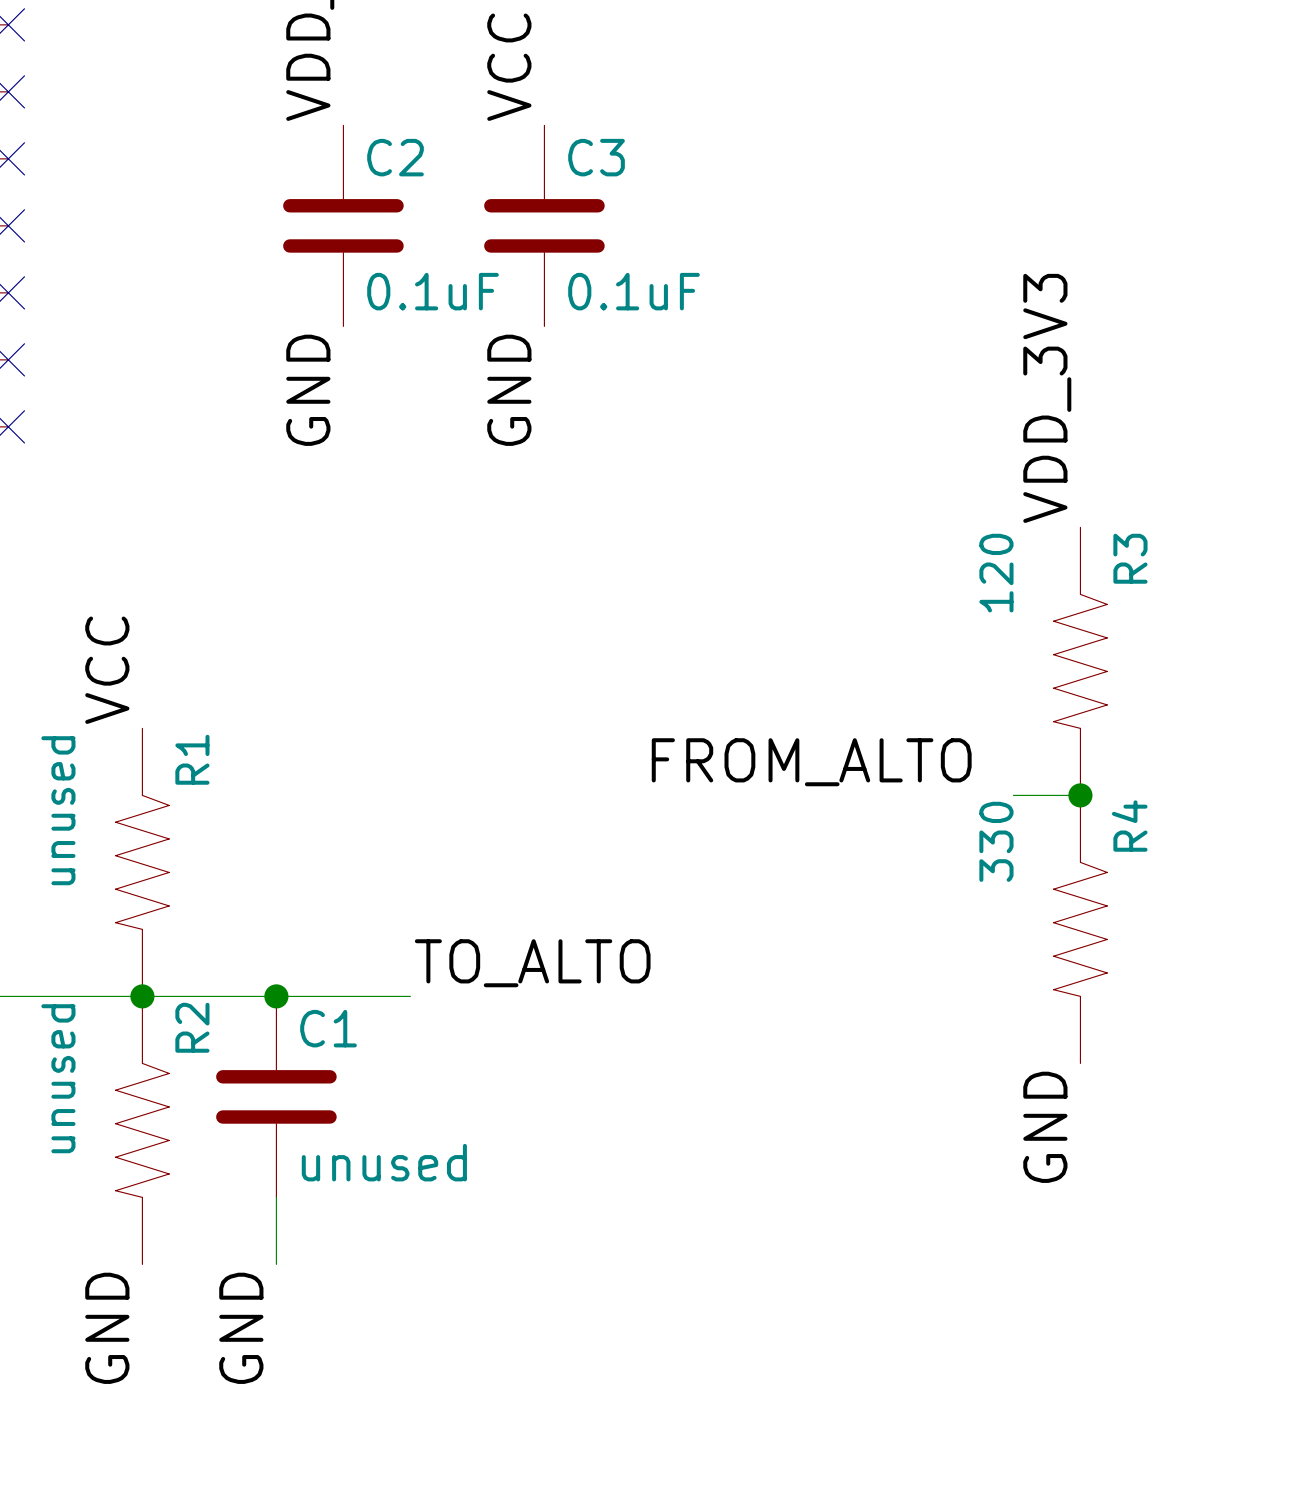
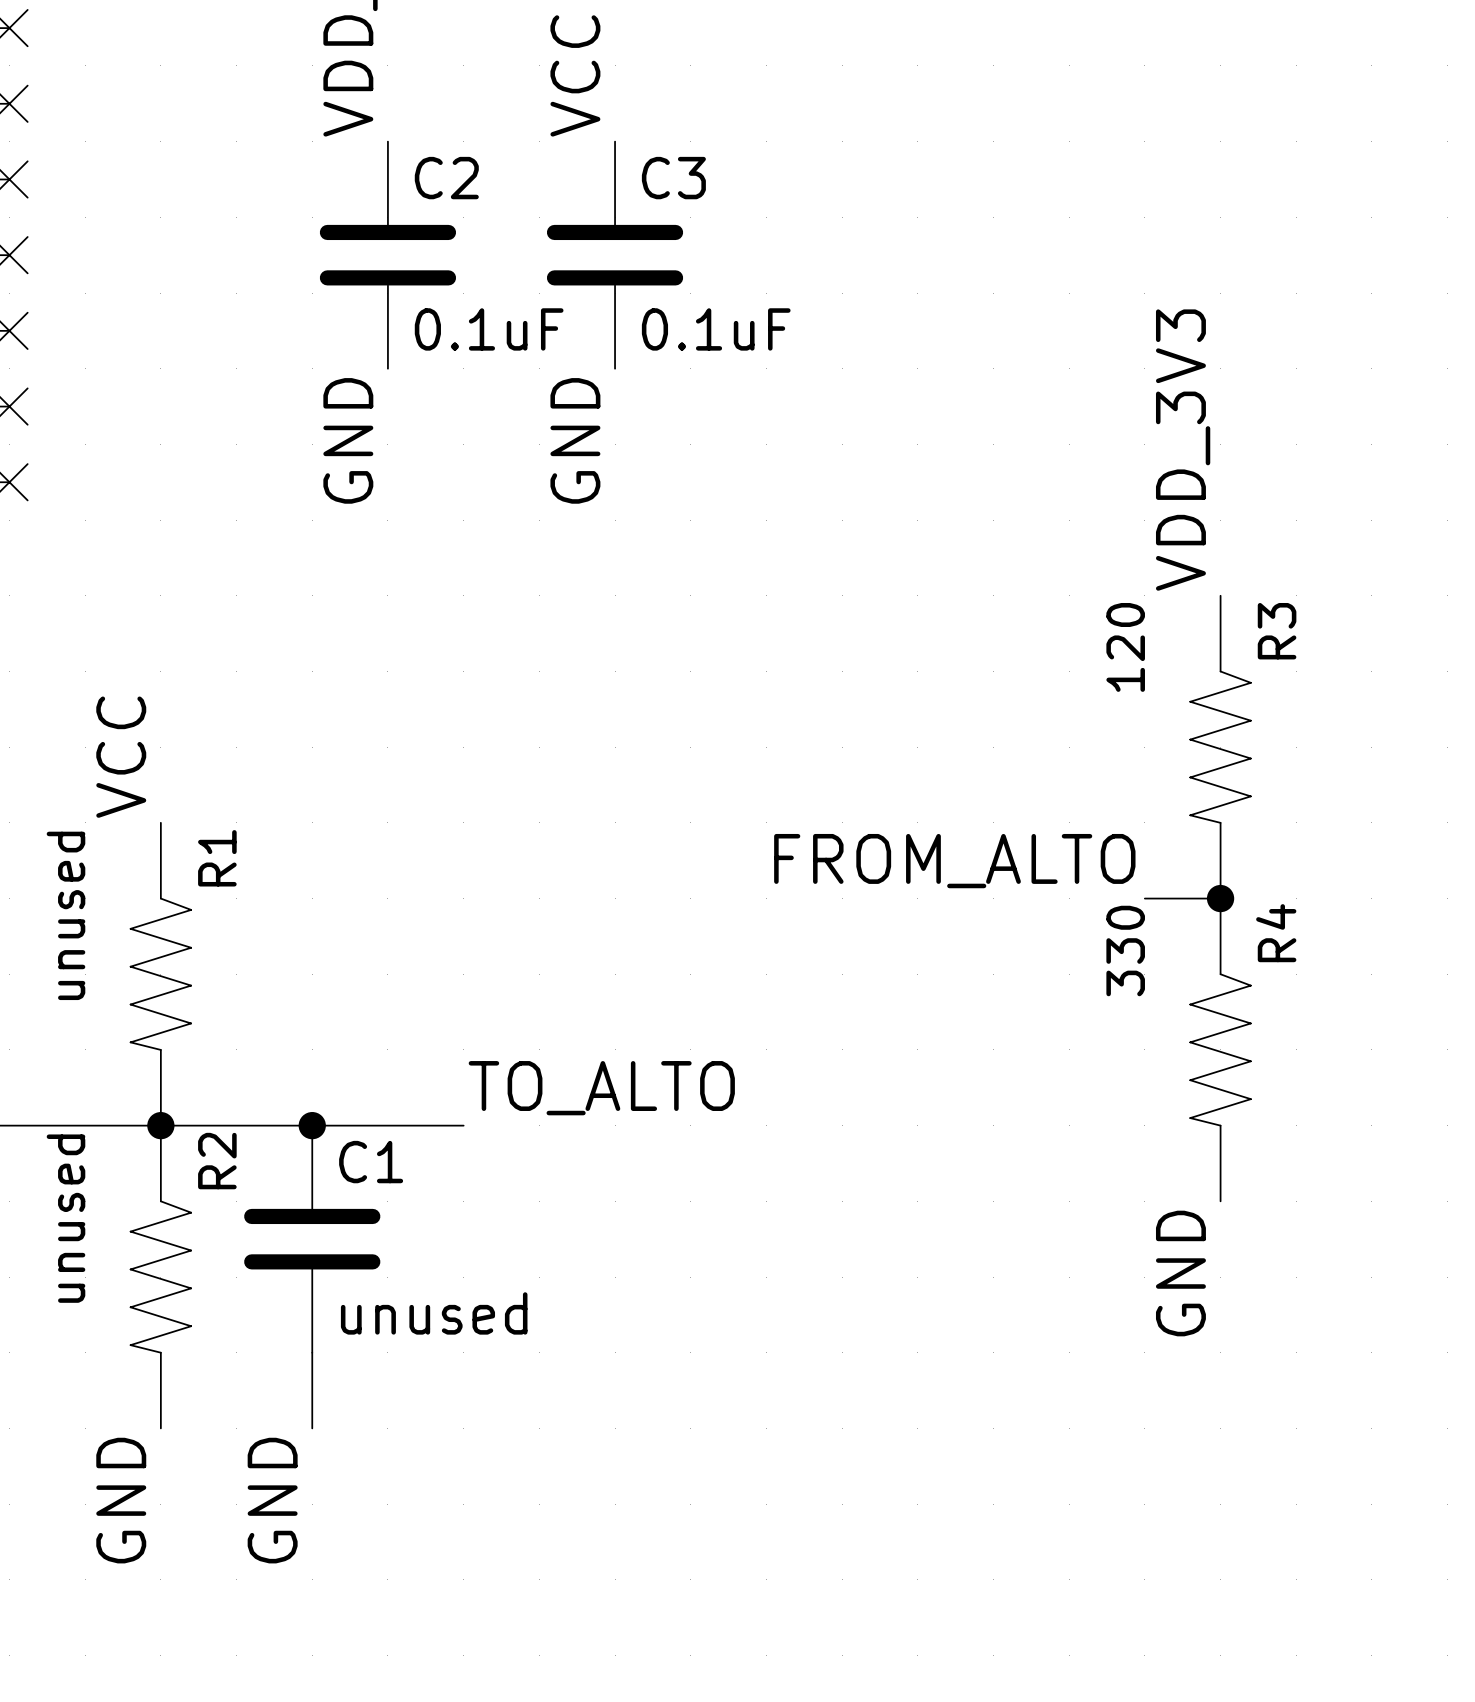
label position: FROM_ALTO (811, 762) -> FROM_ALTO (954, 861)

